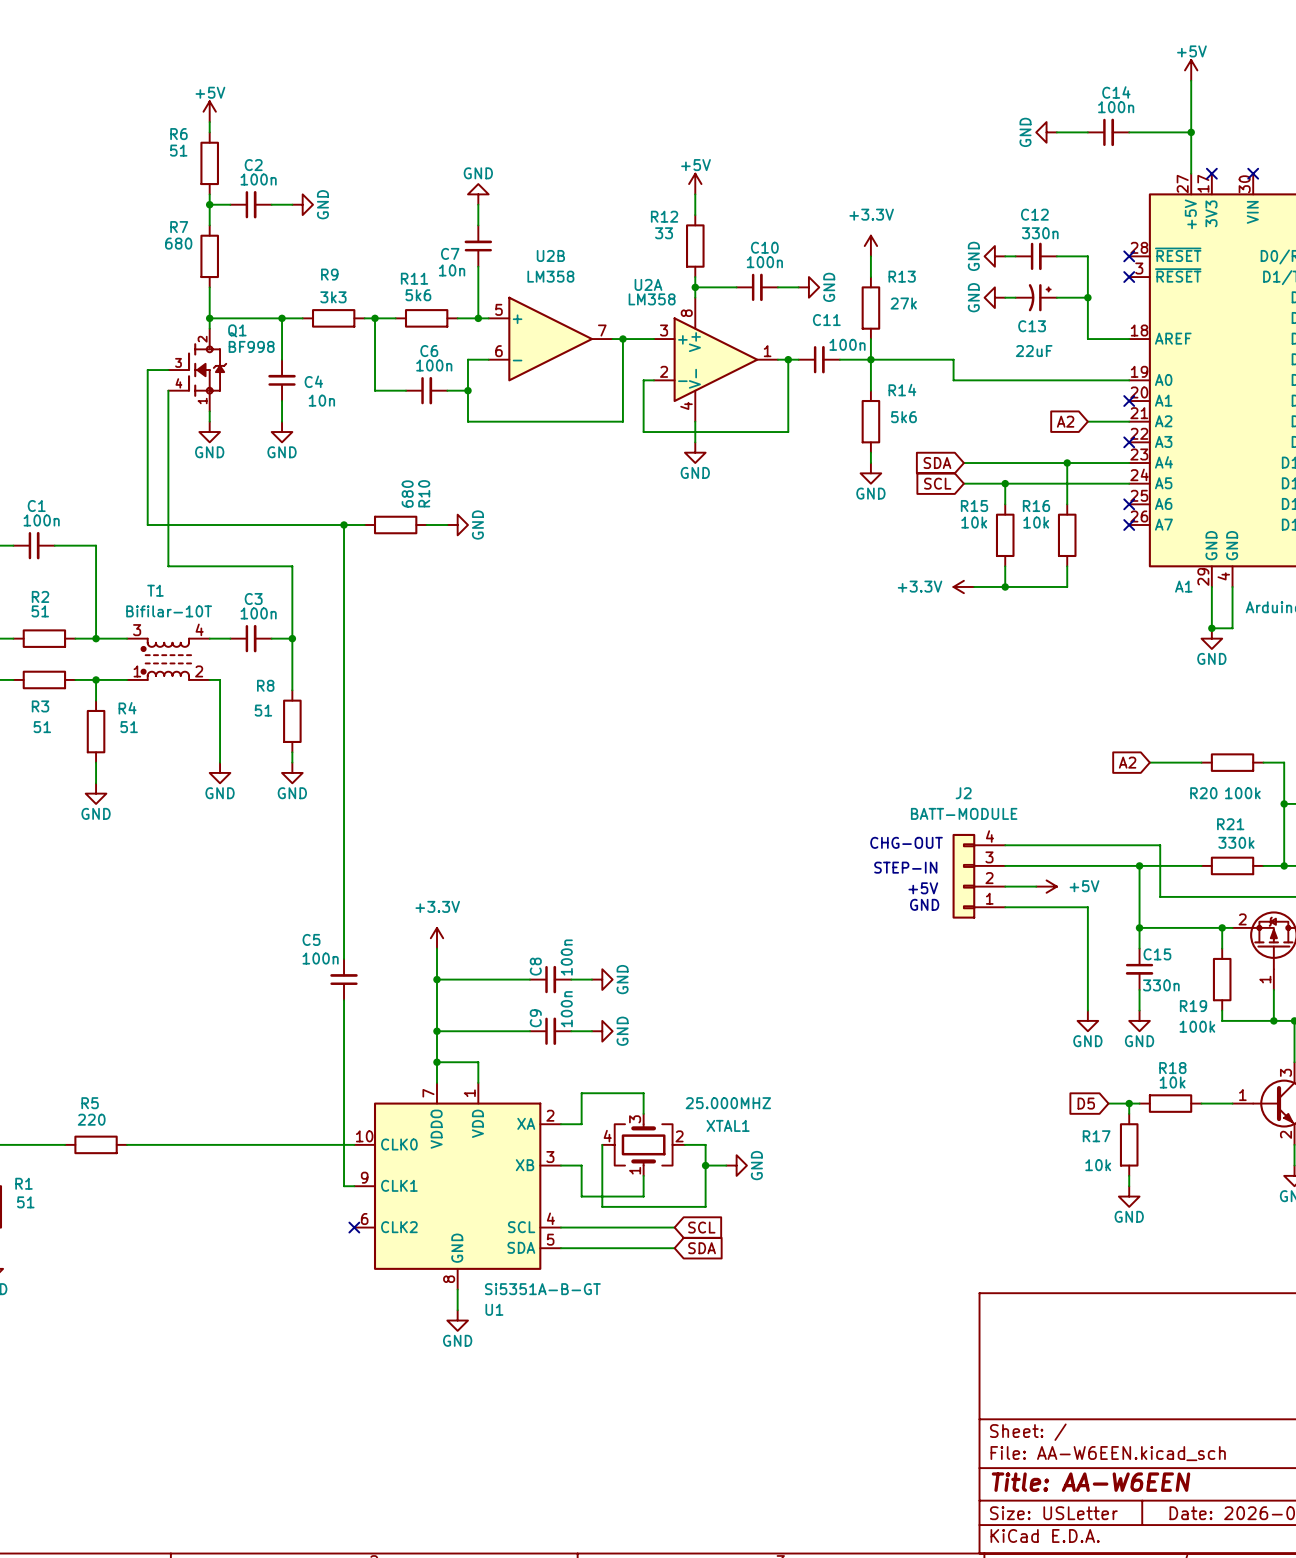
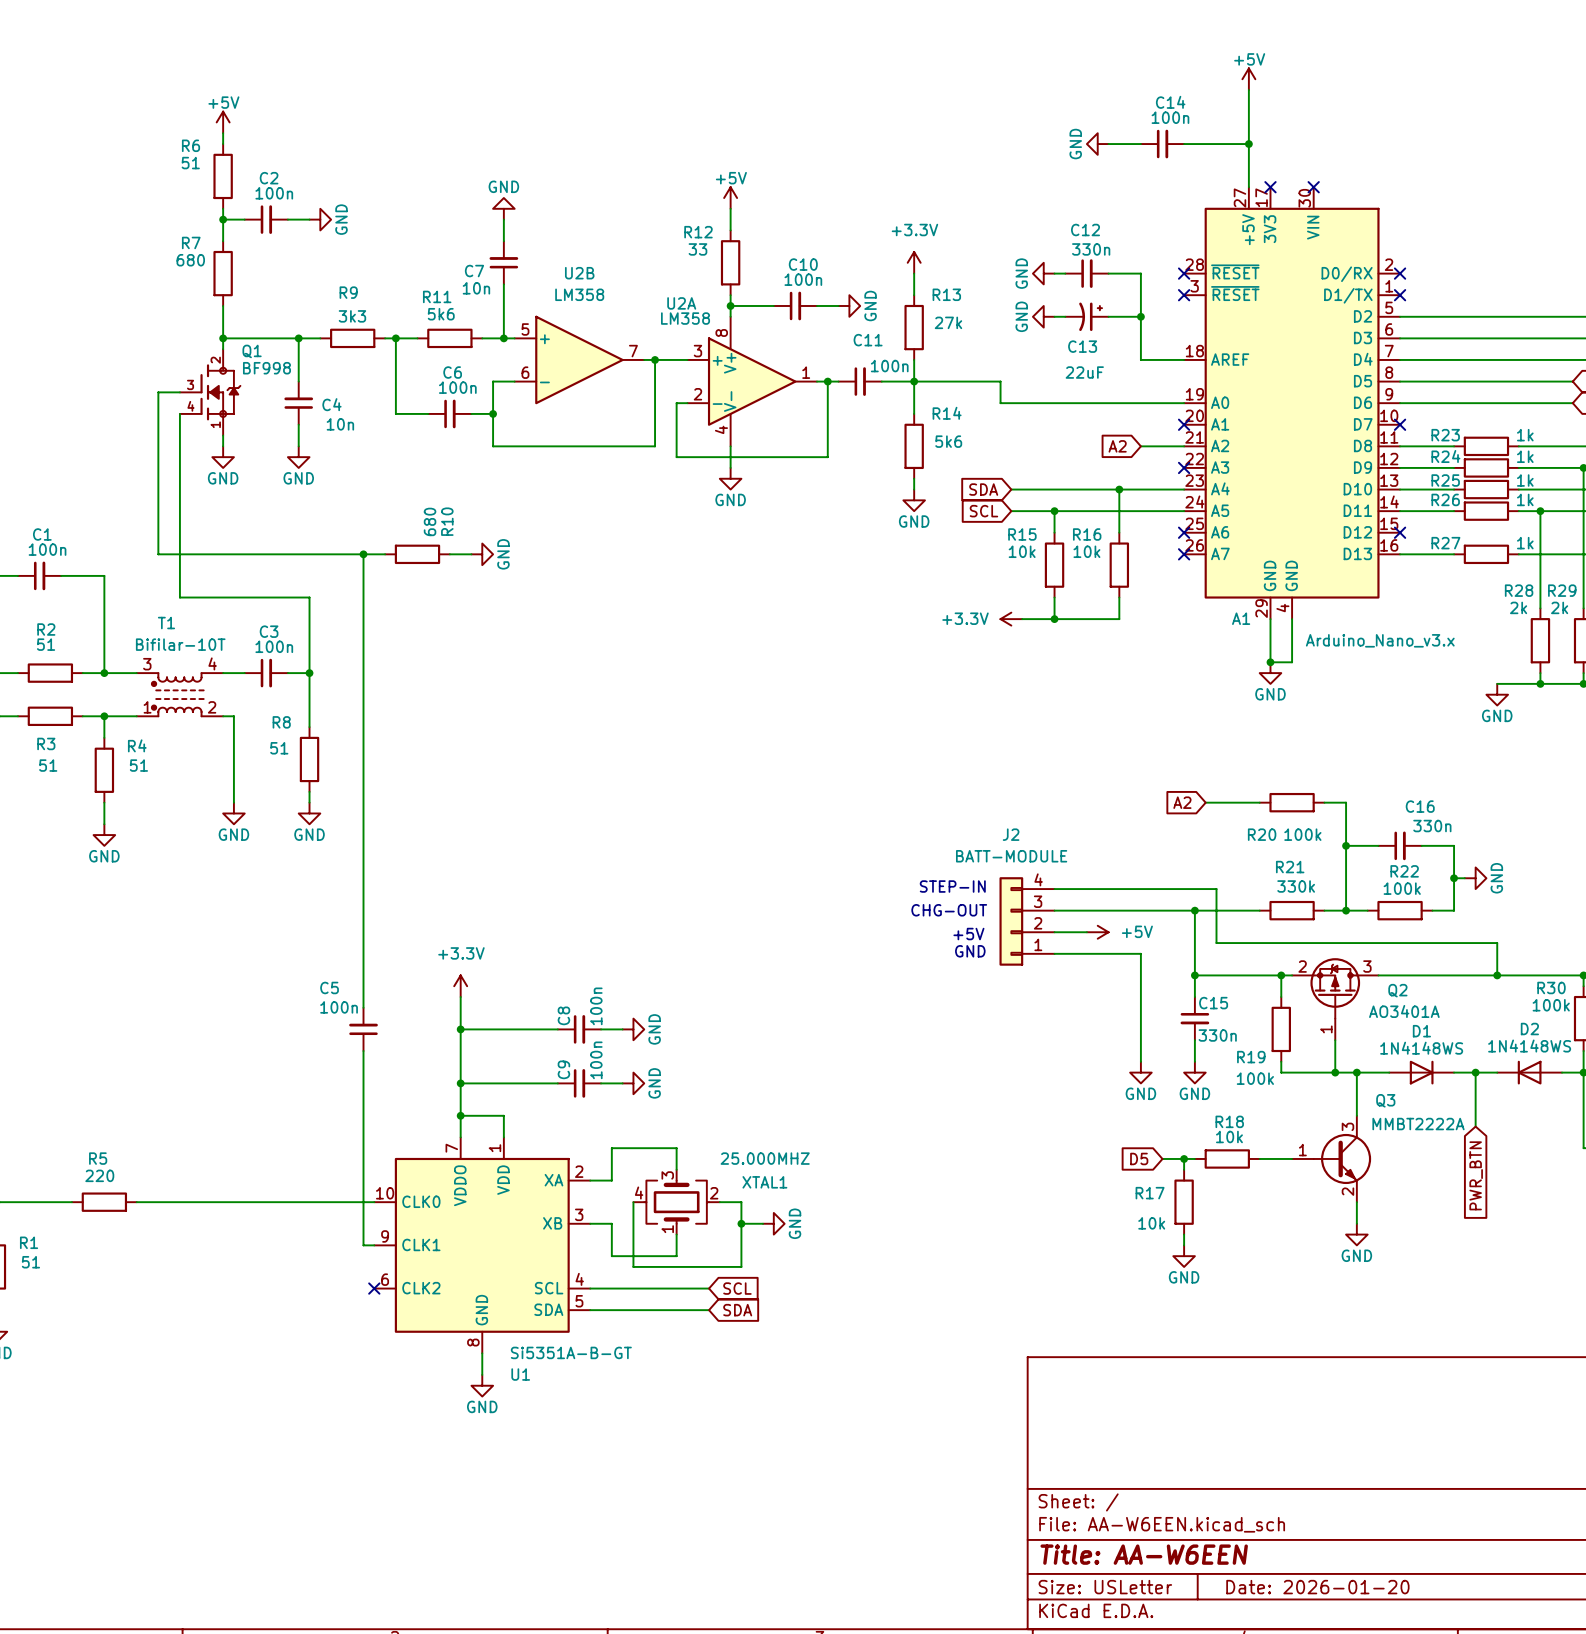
text: CHG-OUT (906, 842) -> STEP-IN (952, 886)
text: STEP-IN (905, 867) -> CHG-OUT (949, 910)

